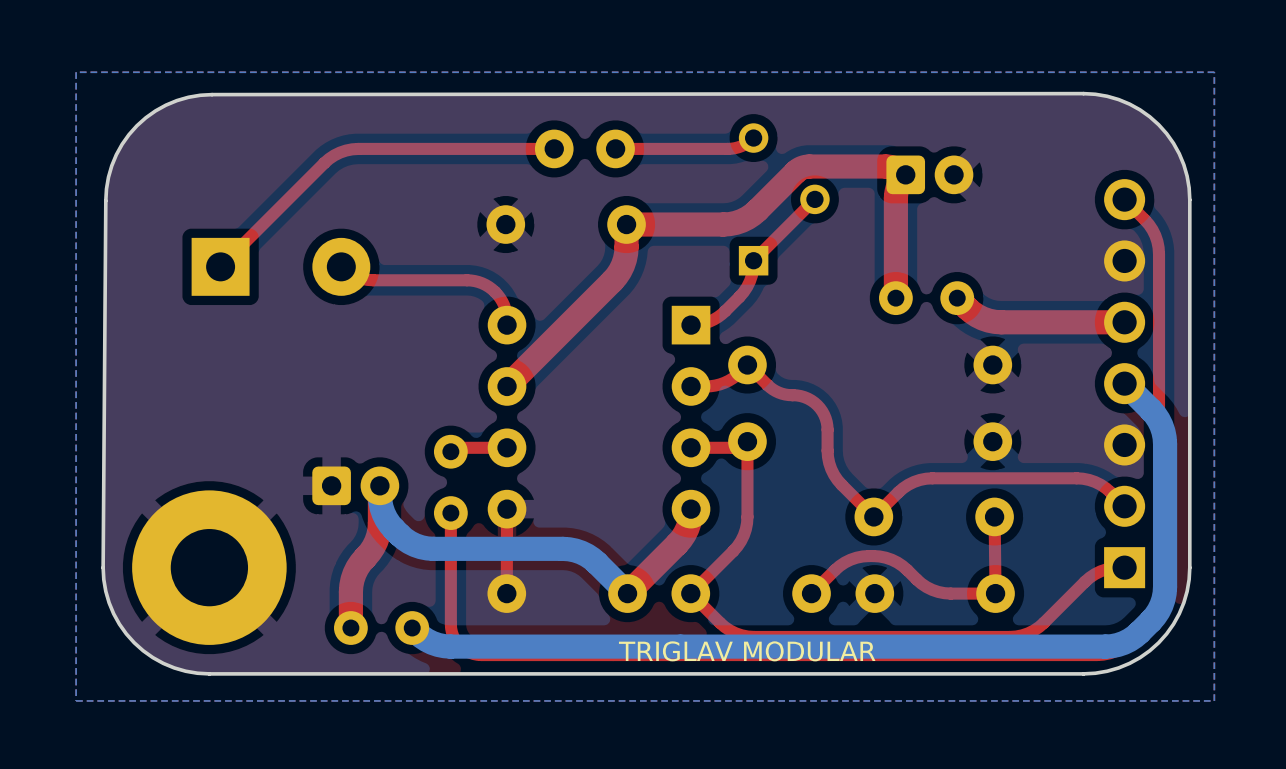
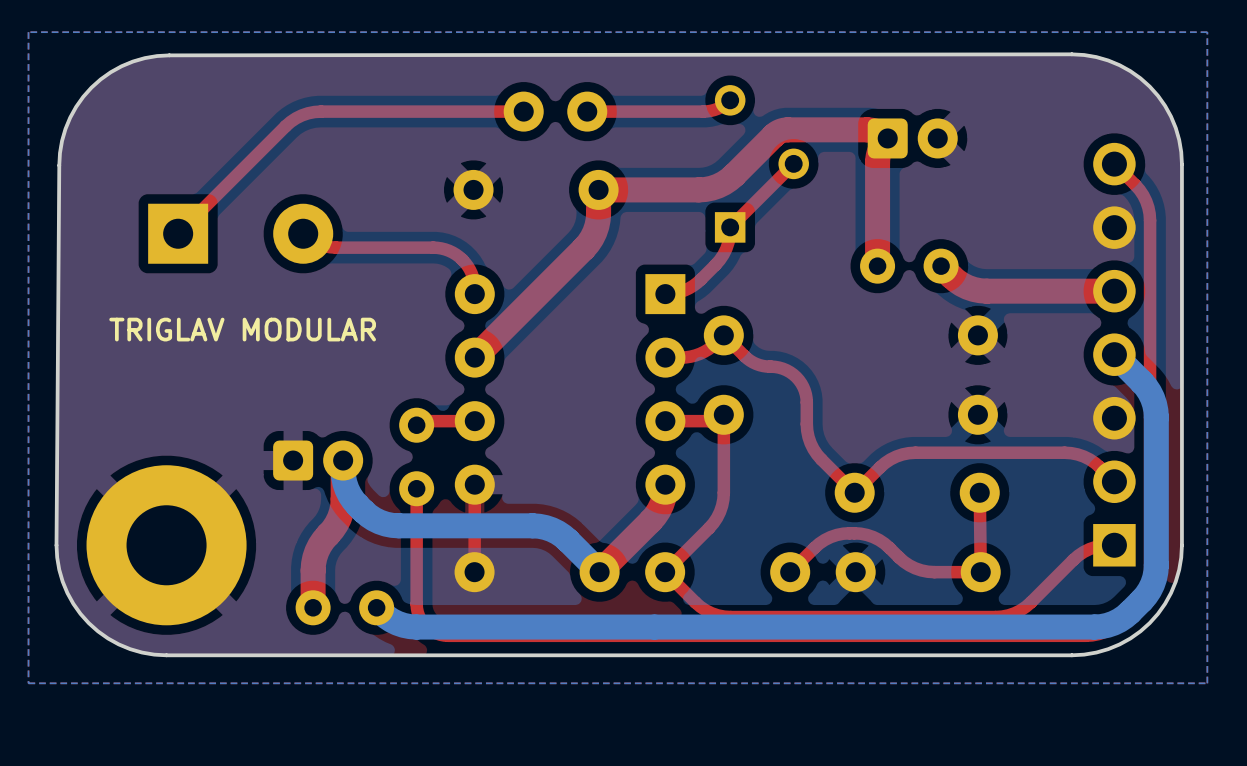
text position: TRIGLAV MODULAR (747, 651) -> TRIGLAV MODULAR (242, 329)

